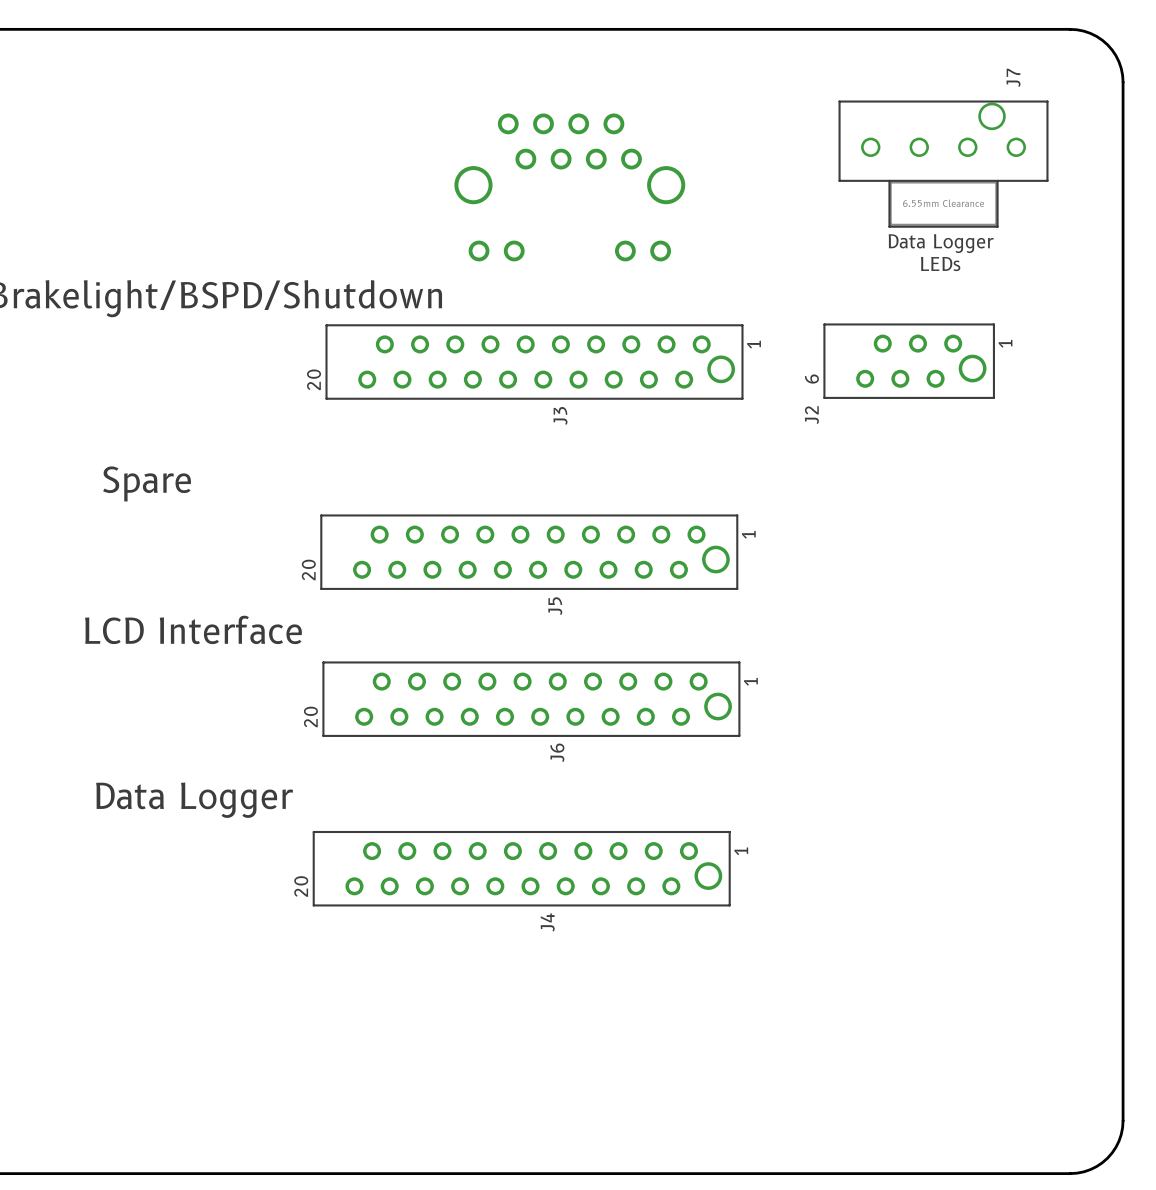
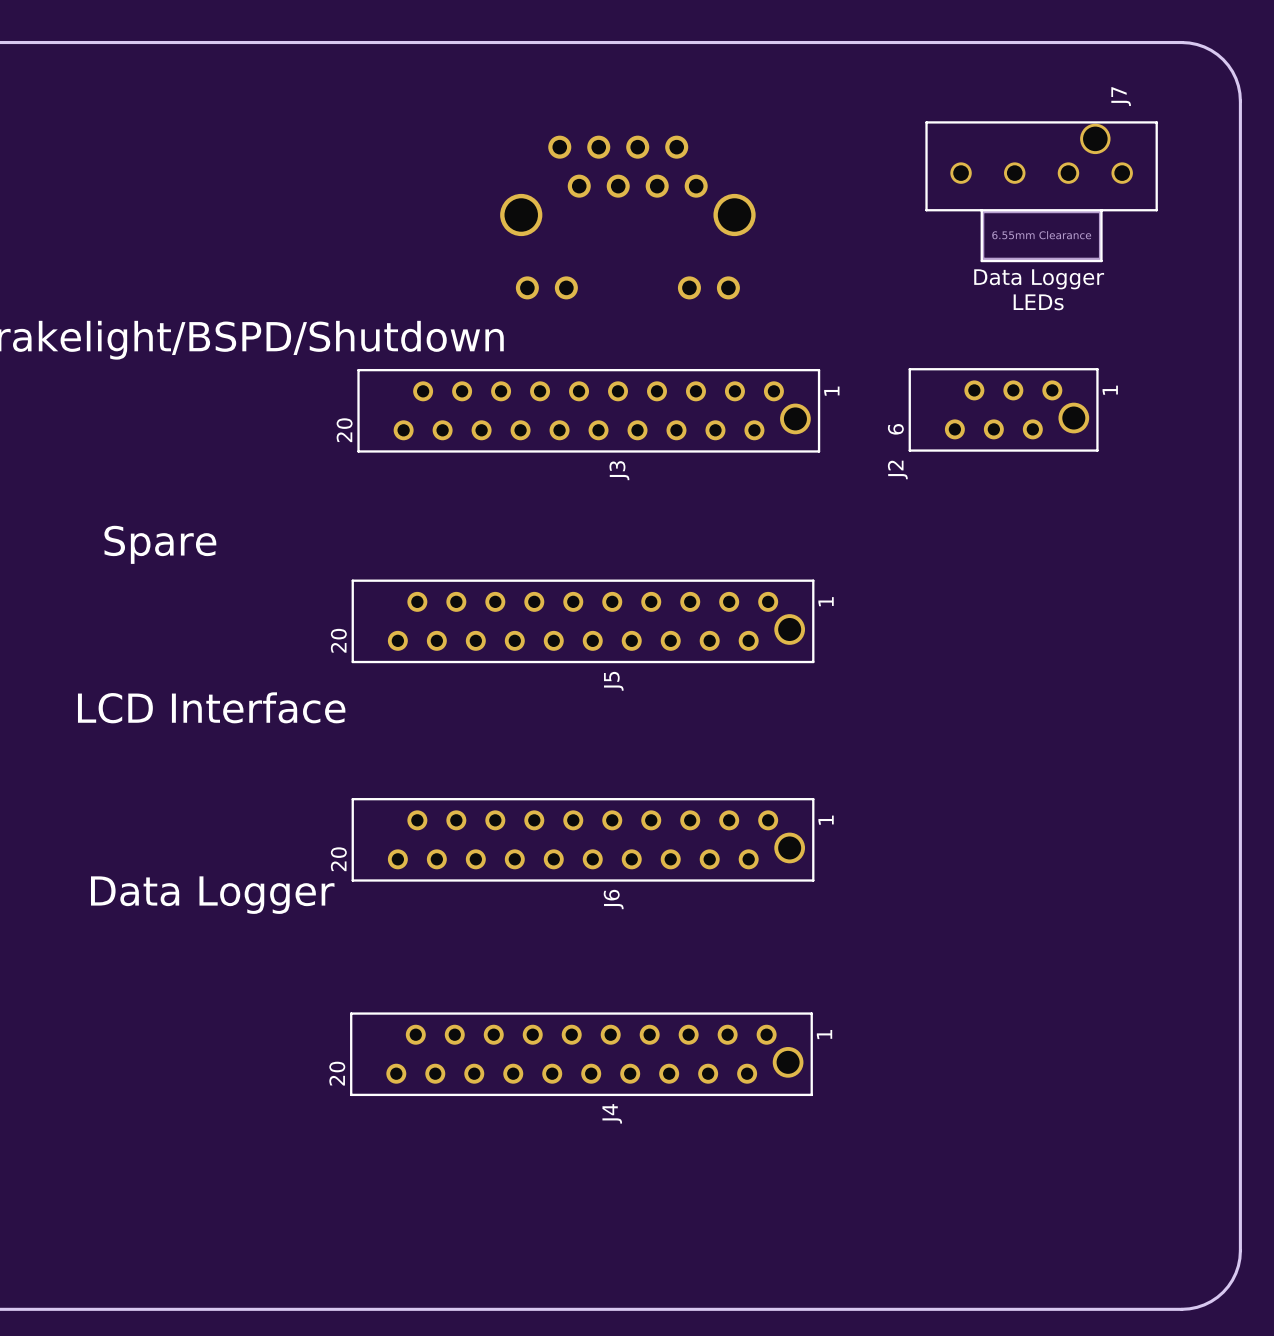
J6 position: (531, 699) -> (583, 839)
J4 position: (521, 868) -> (581, 1054)

